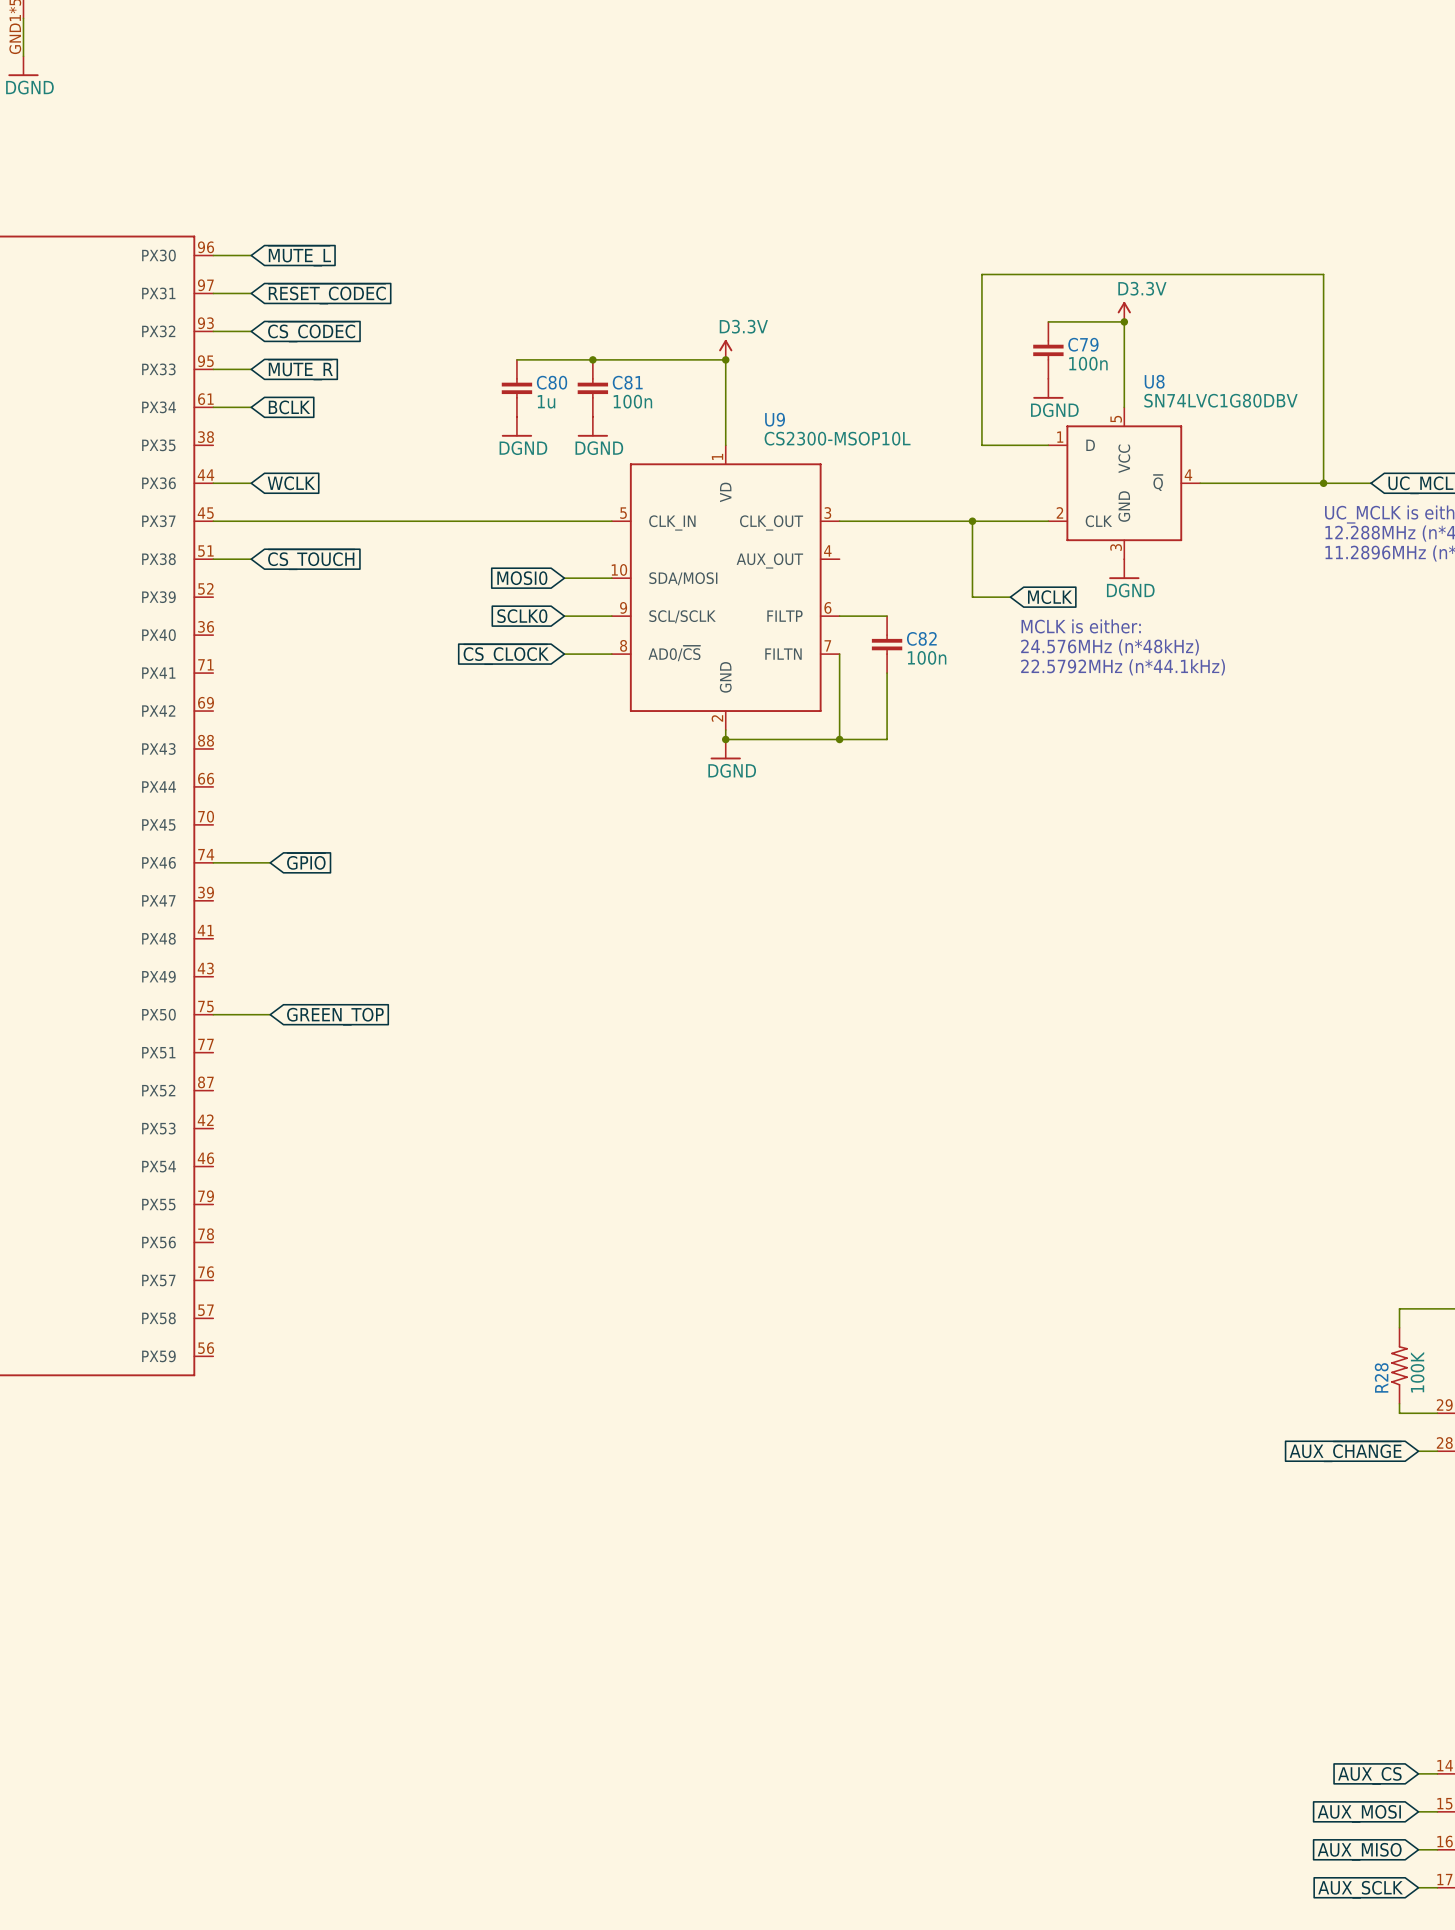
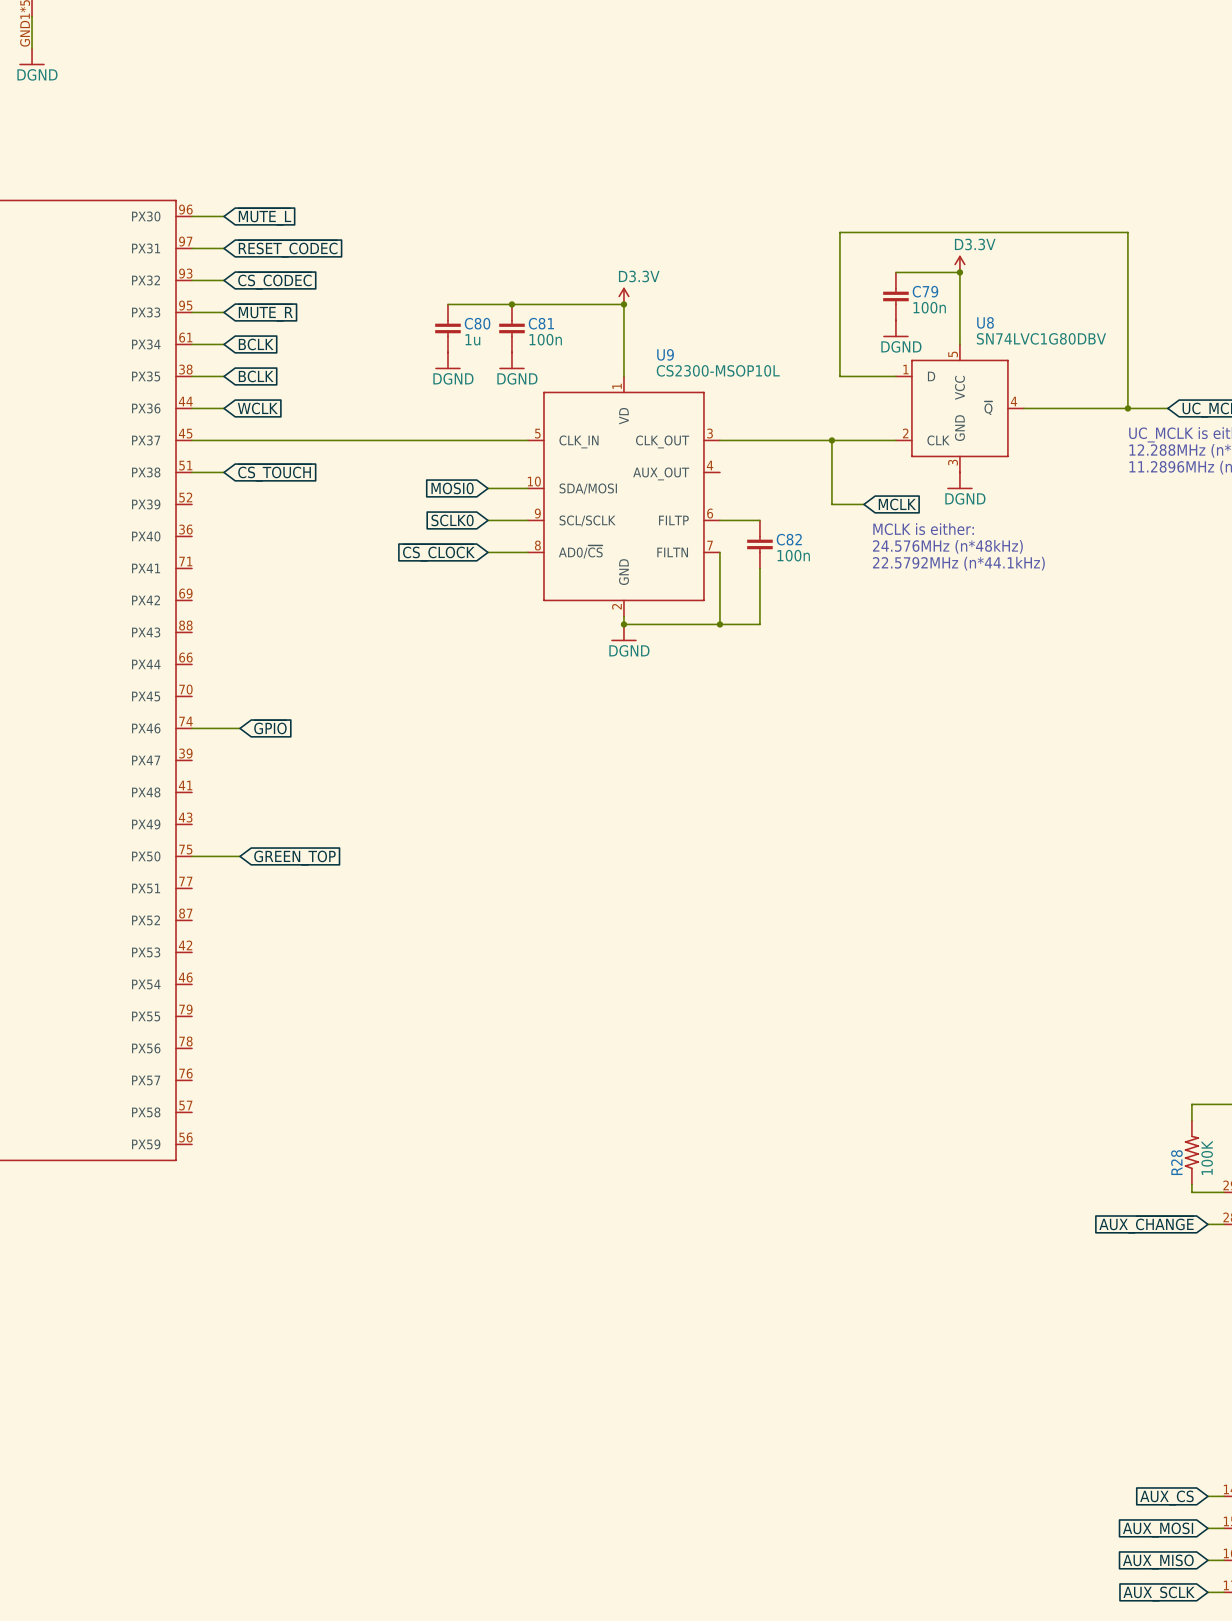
wire: none -> (192, 376) (224, 376)
global label: none -> BCLK (256, 376)

